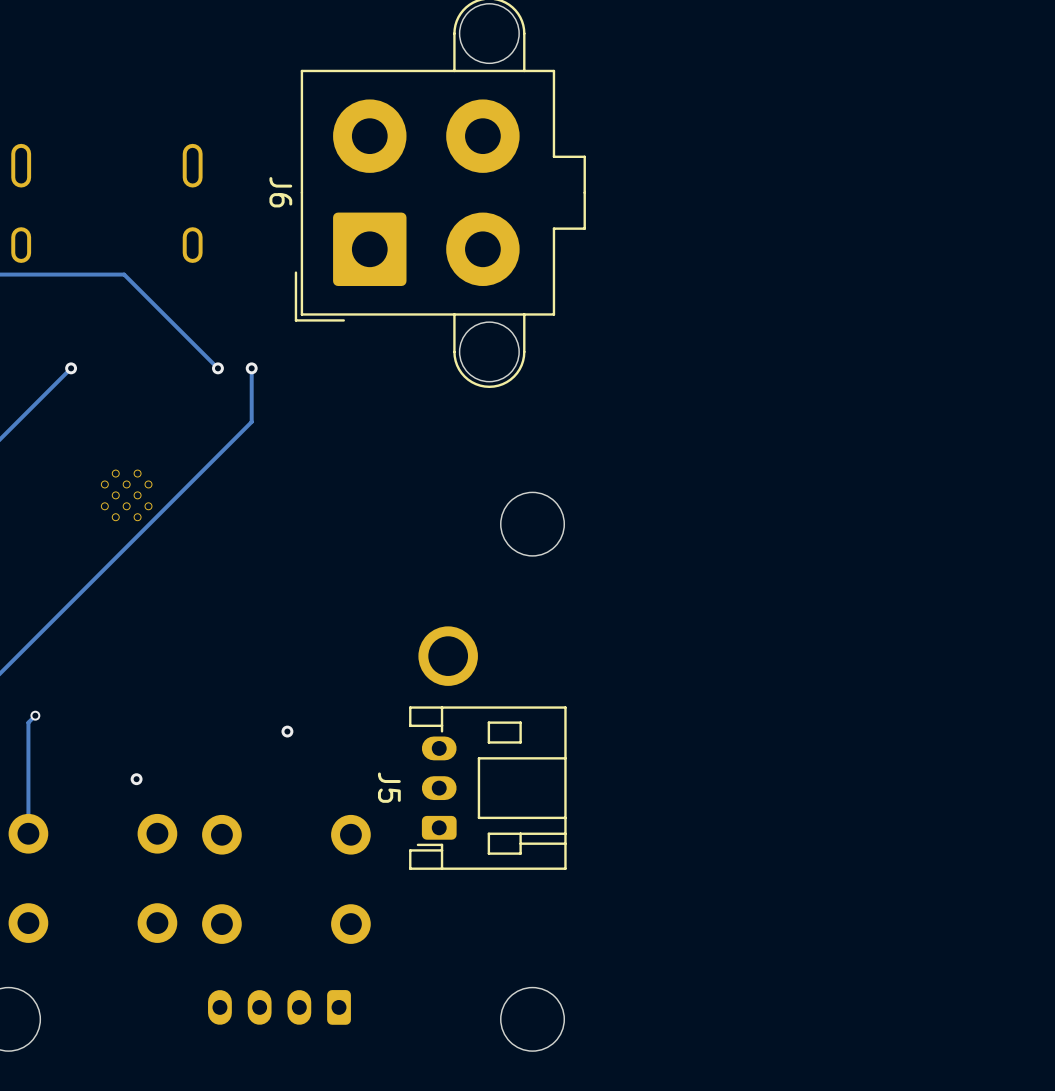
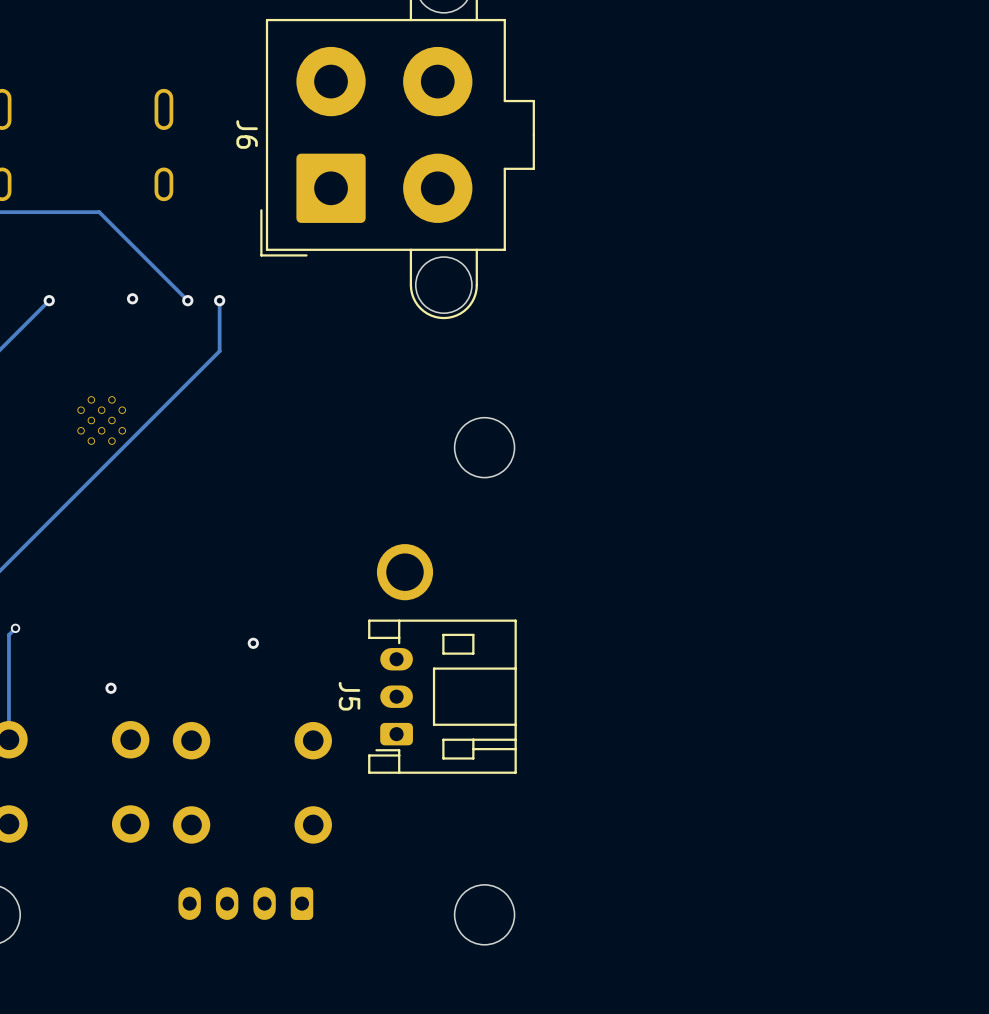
via: none -> (132, 298)

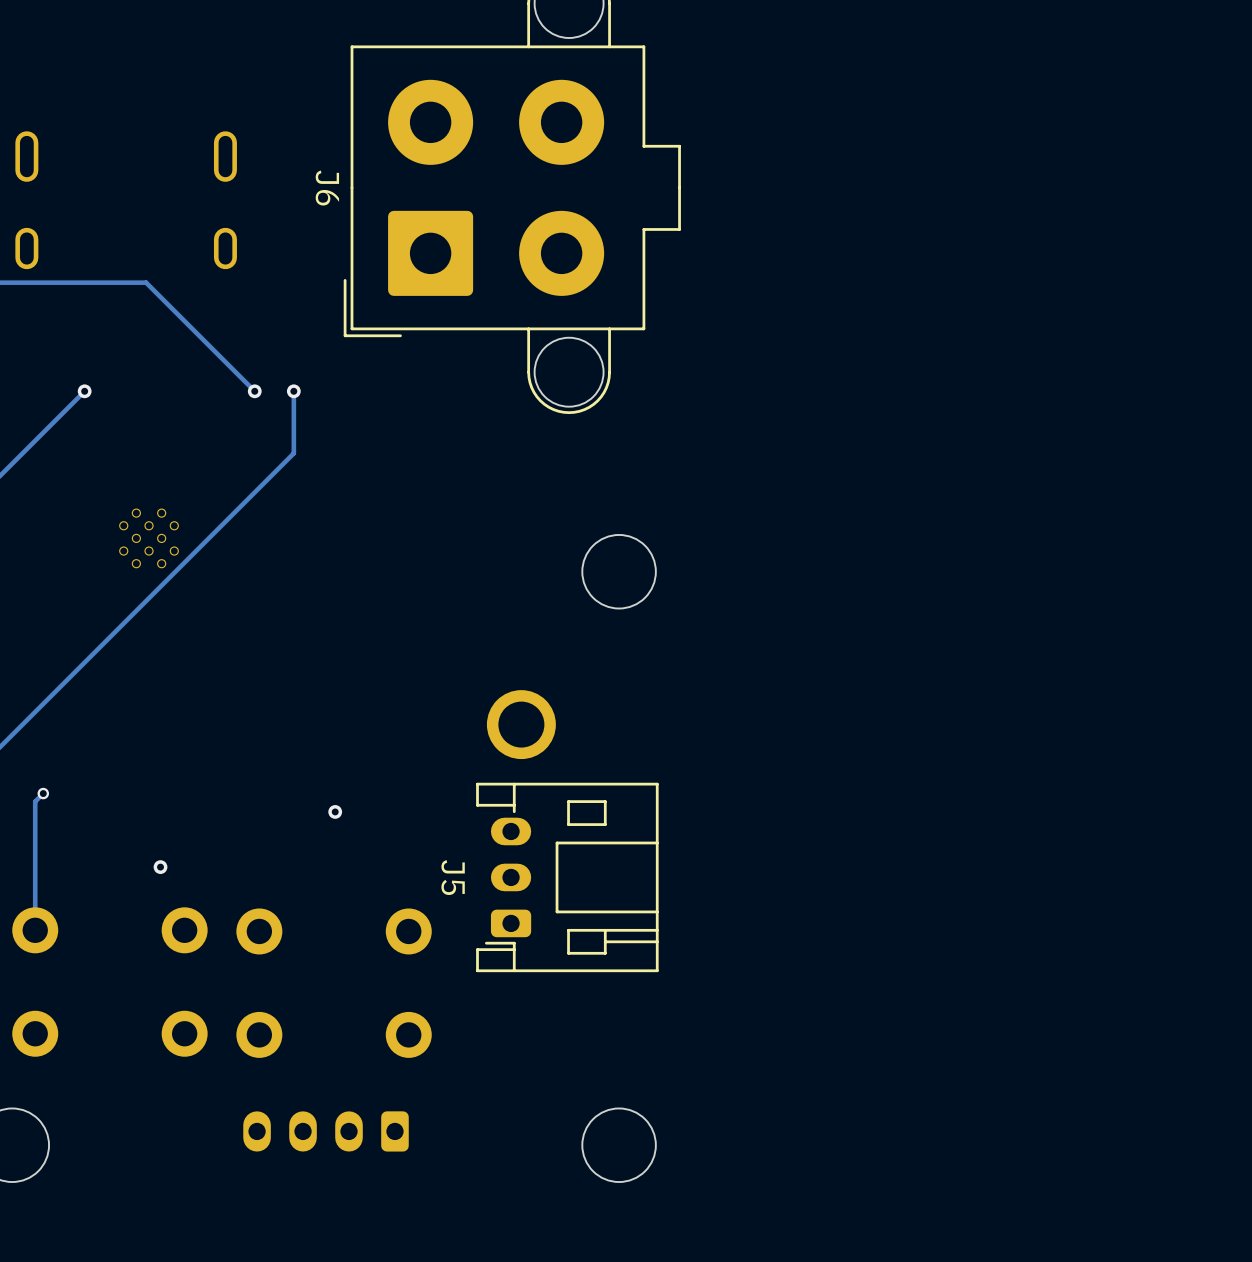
via: (132, 298) -> none

